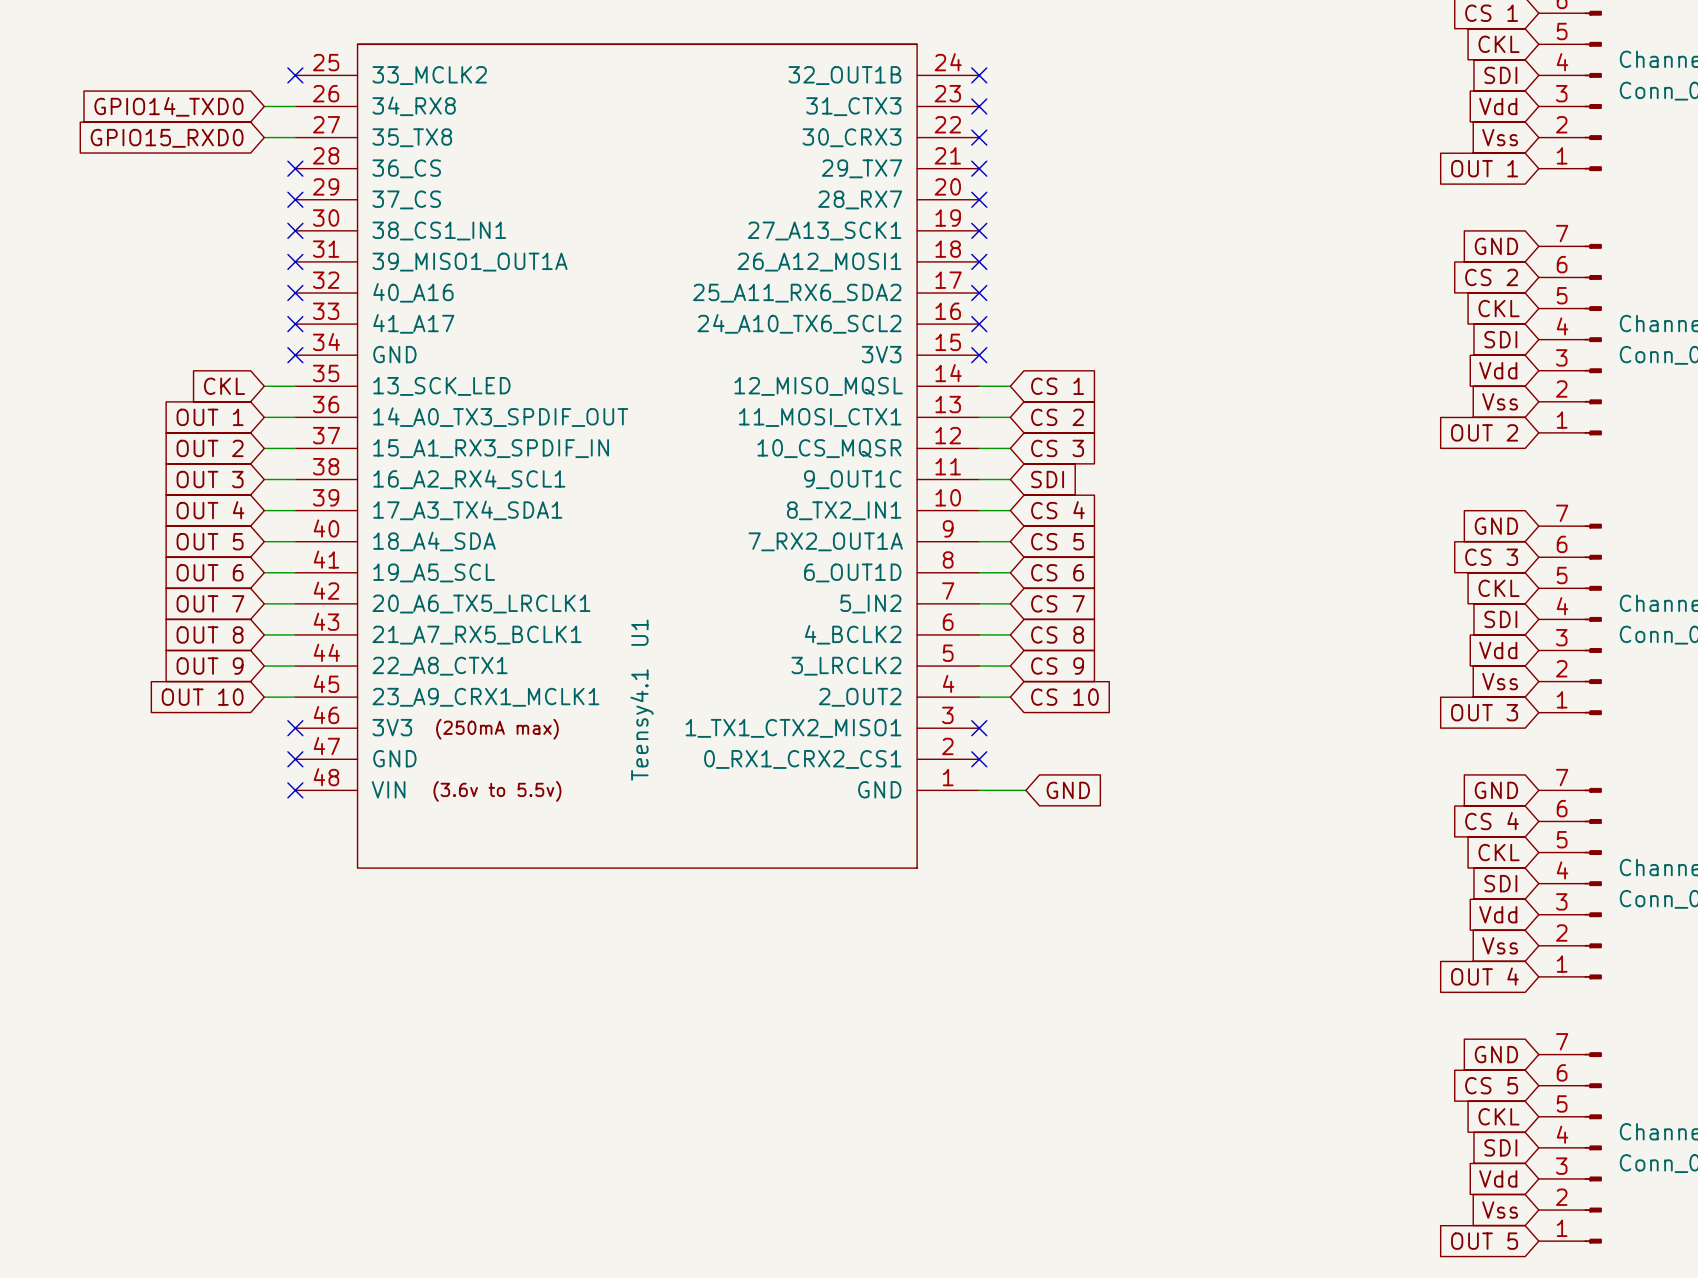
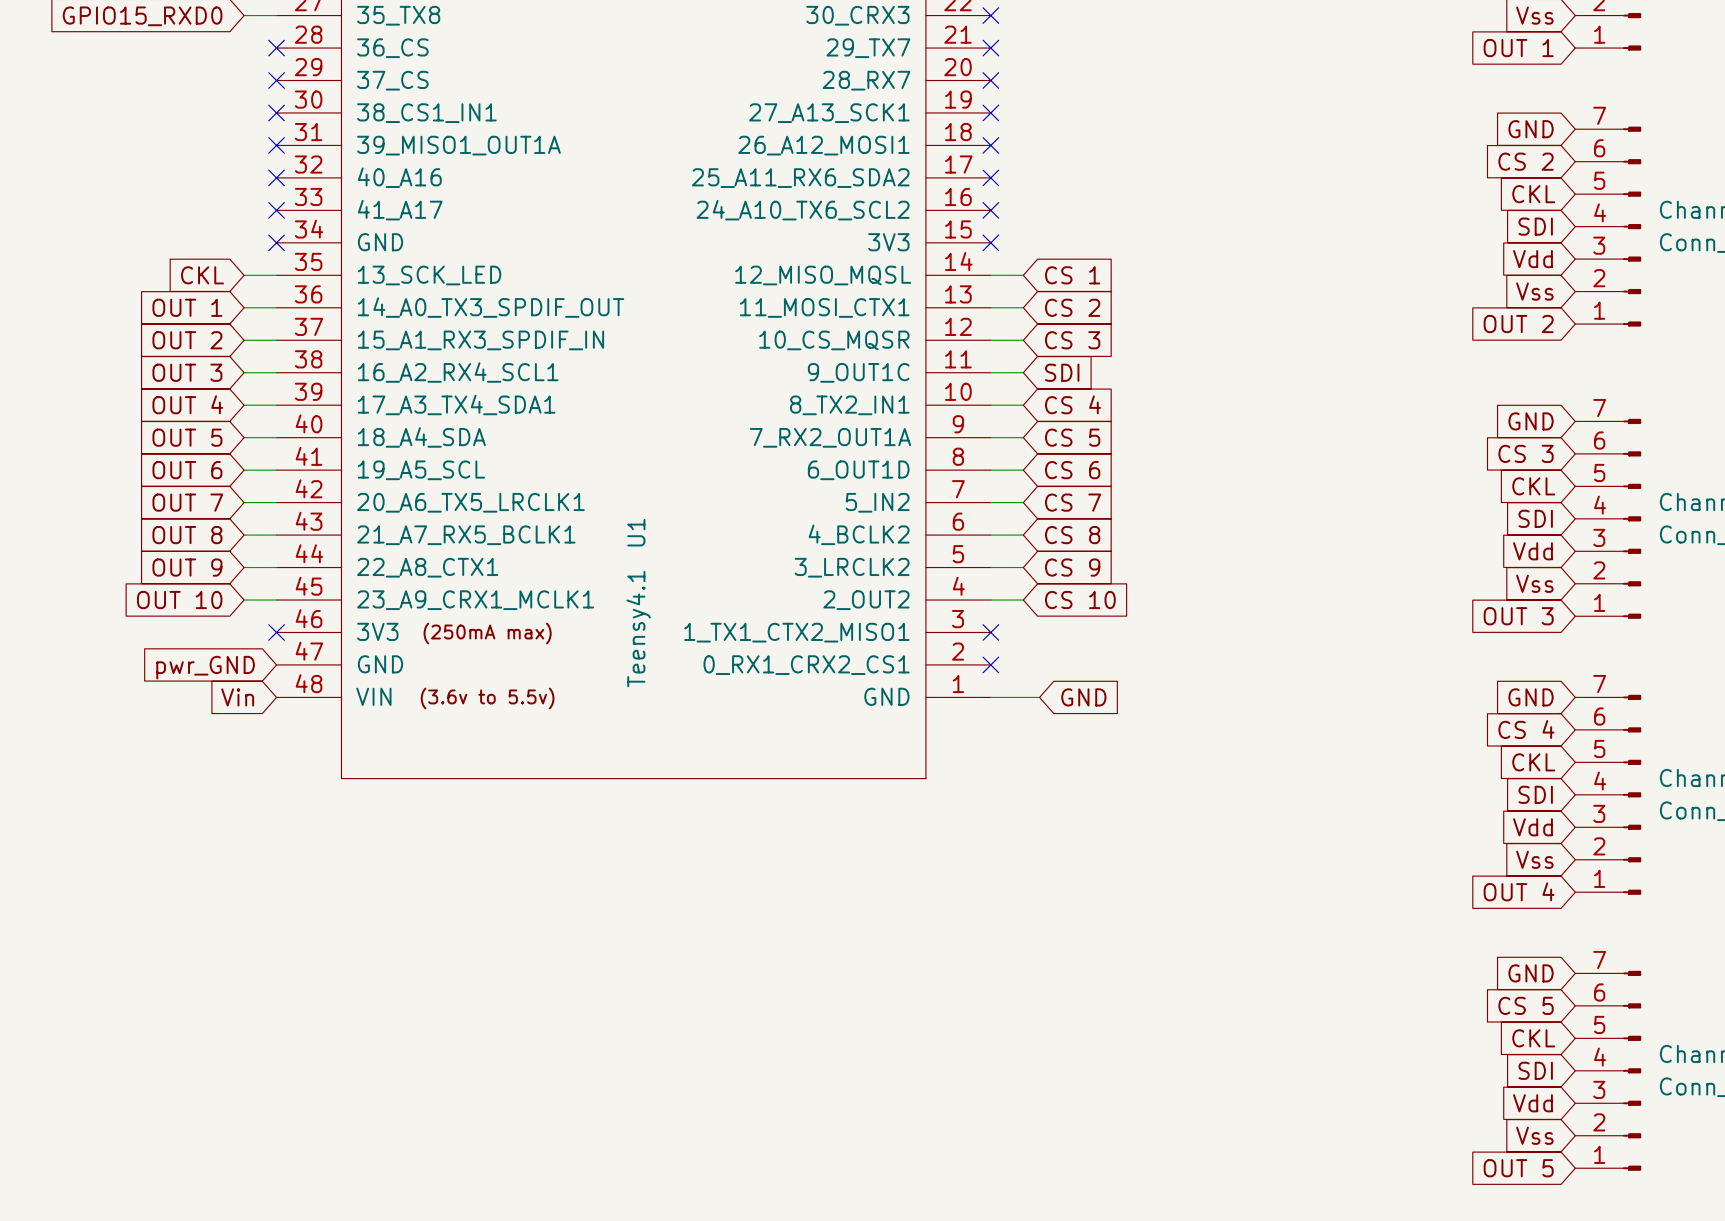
no-connect mark: (295, 759) -> none
global label: none -> pwr_GND (205, 667)
global label: none -> Vin (237, 697)
no-connect mark: (295, 790) -> none

